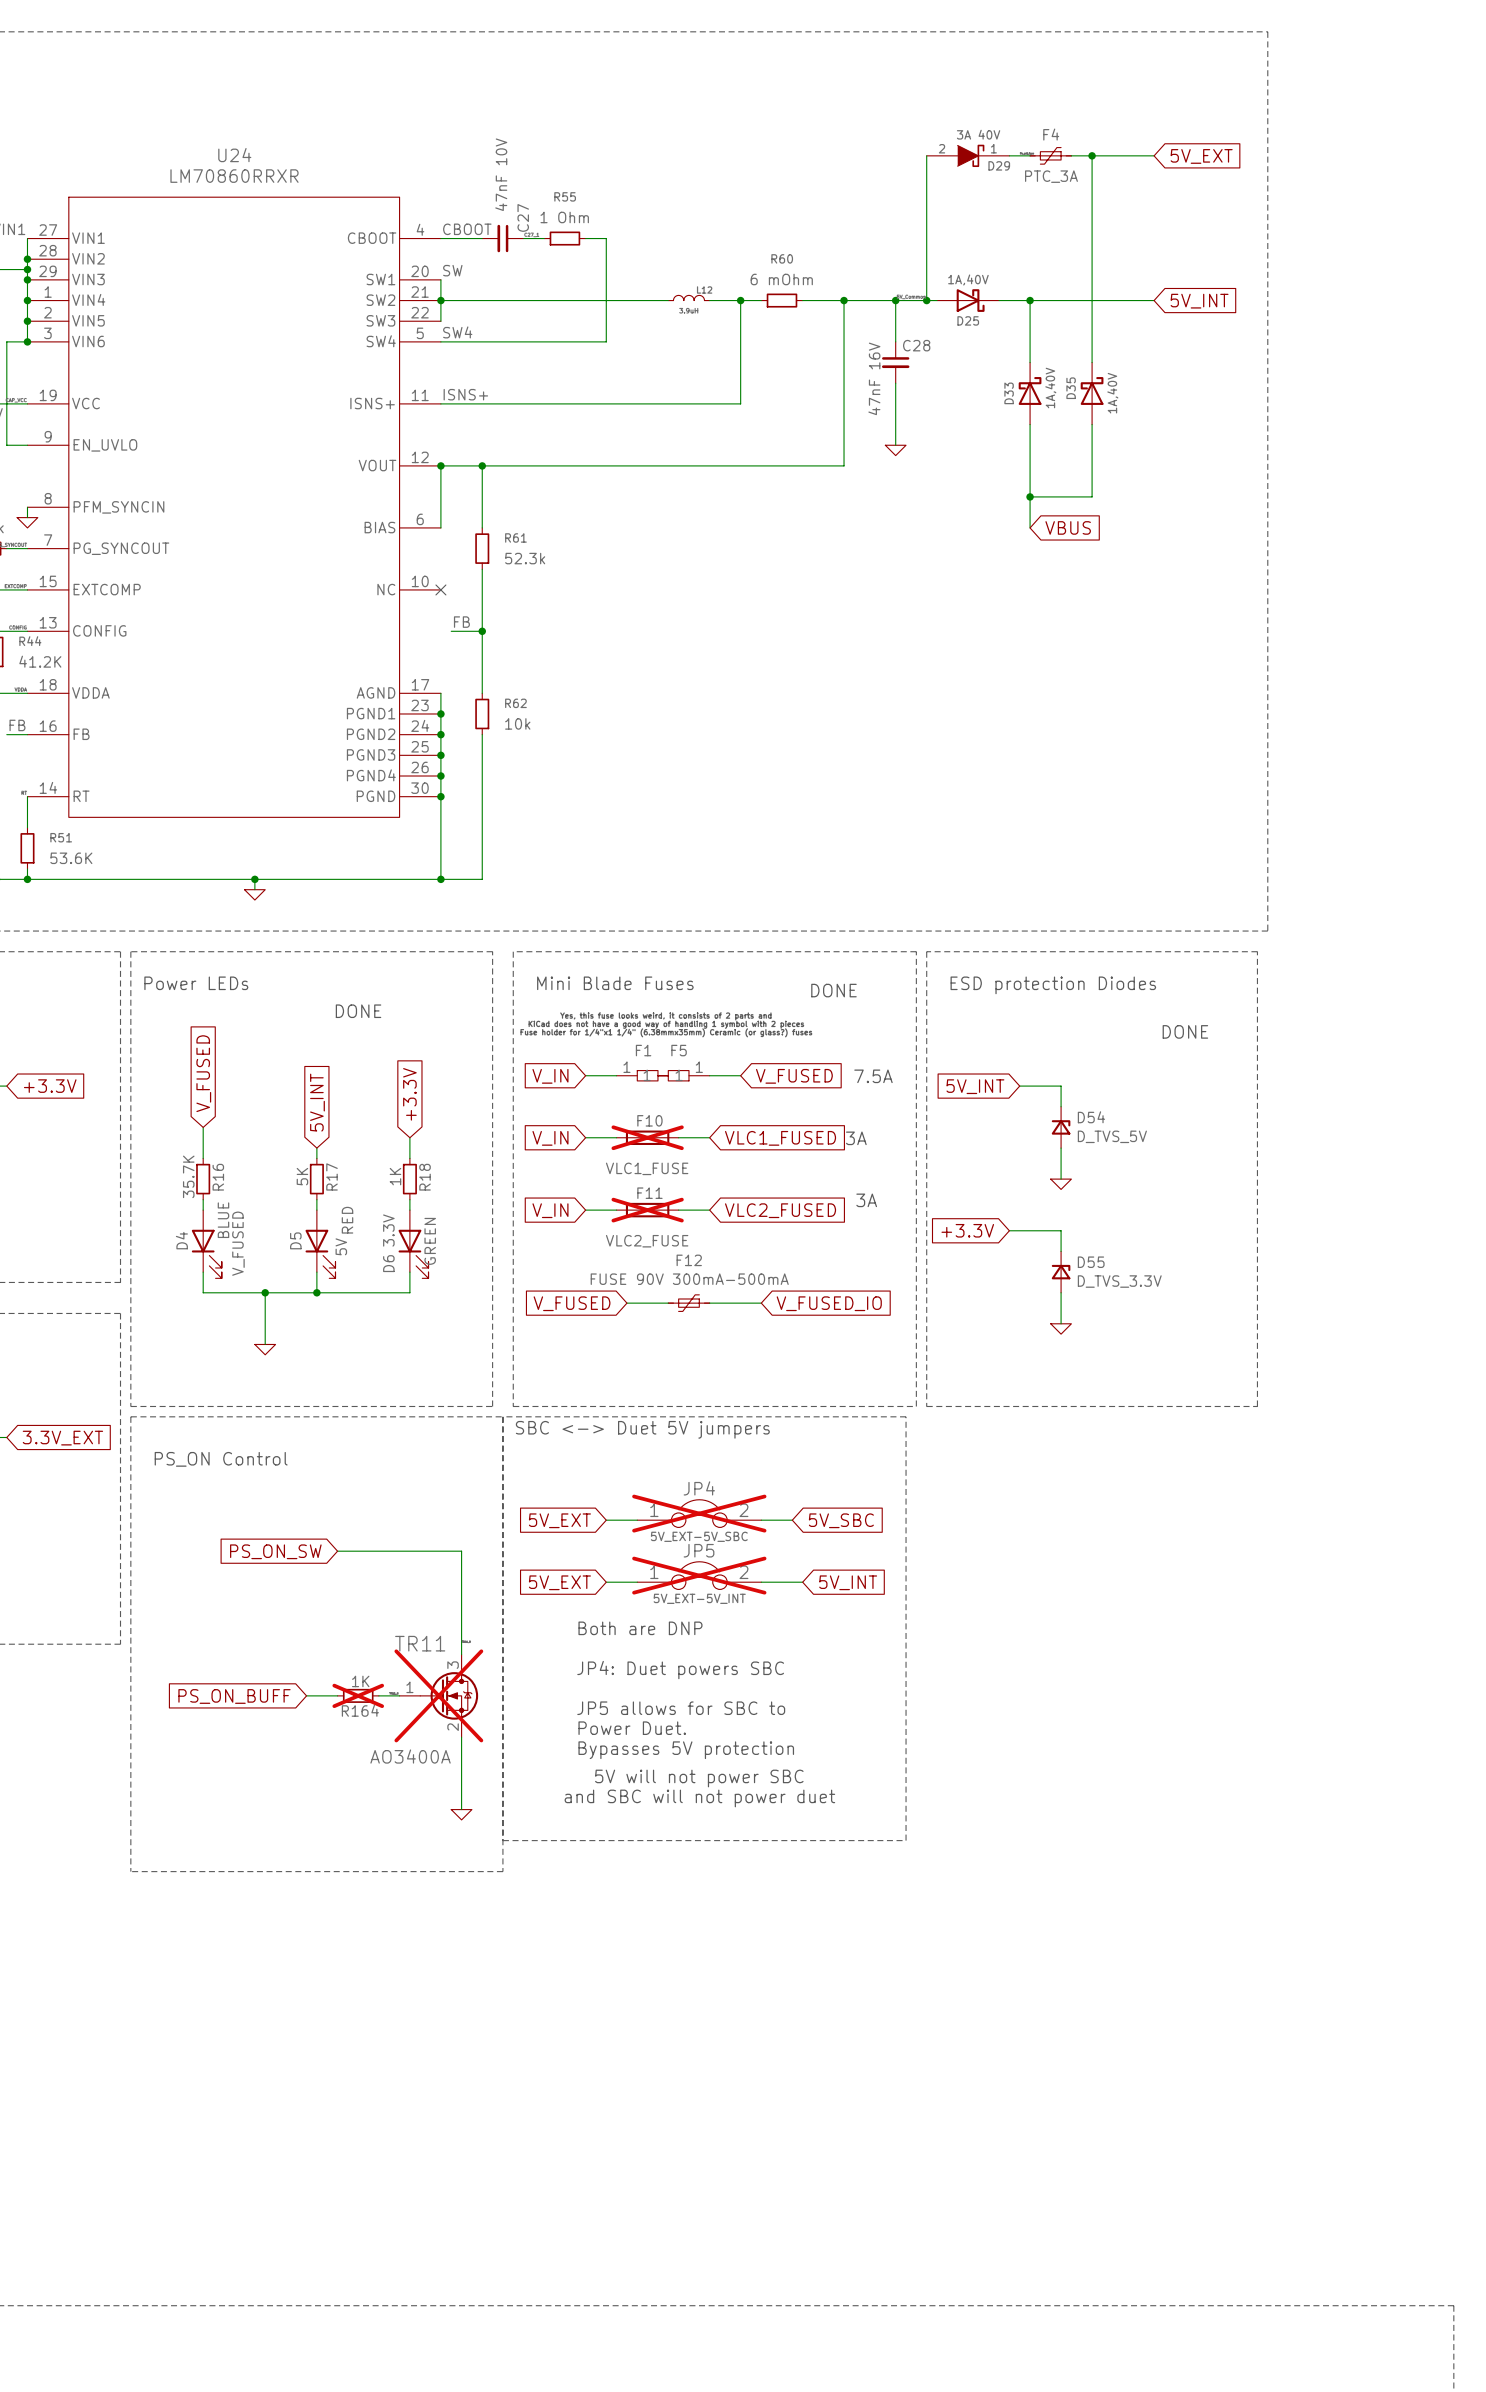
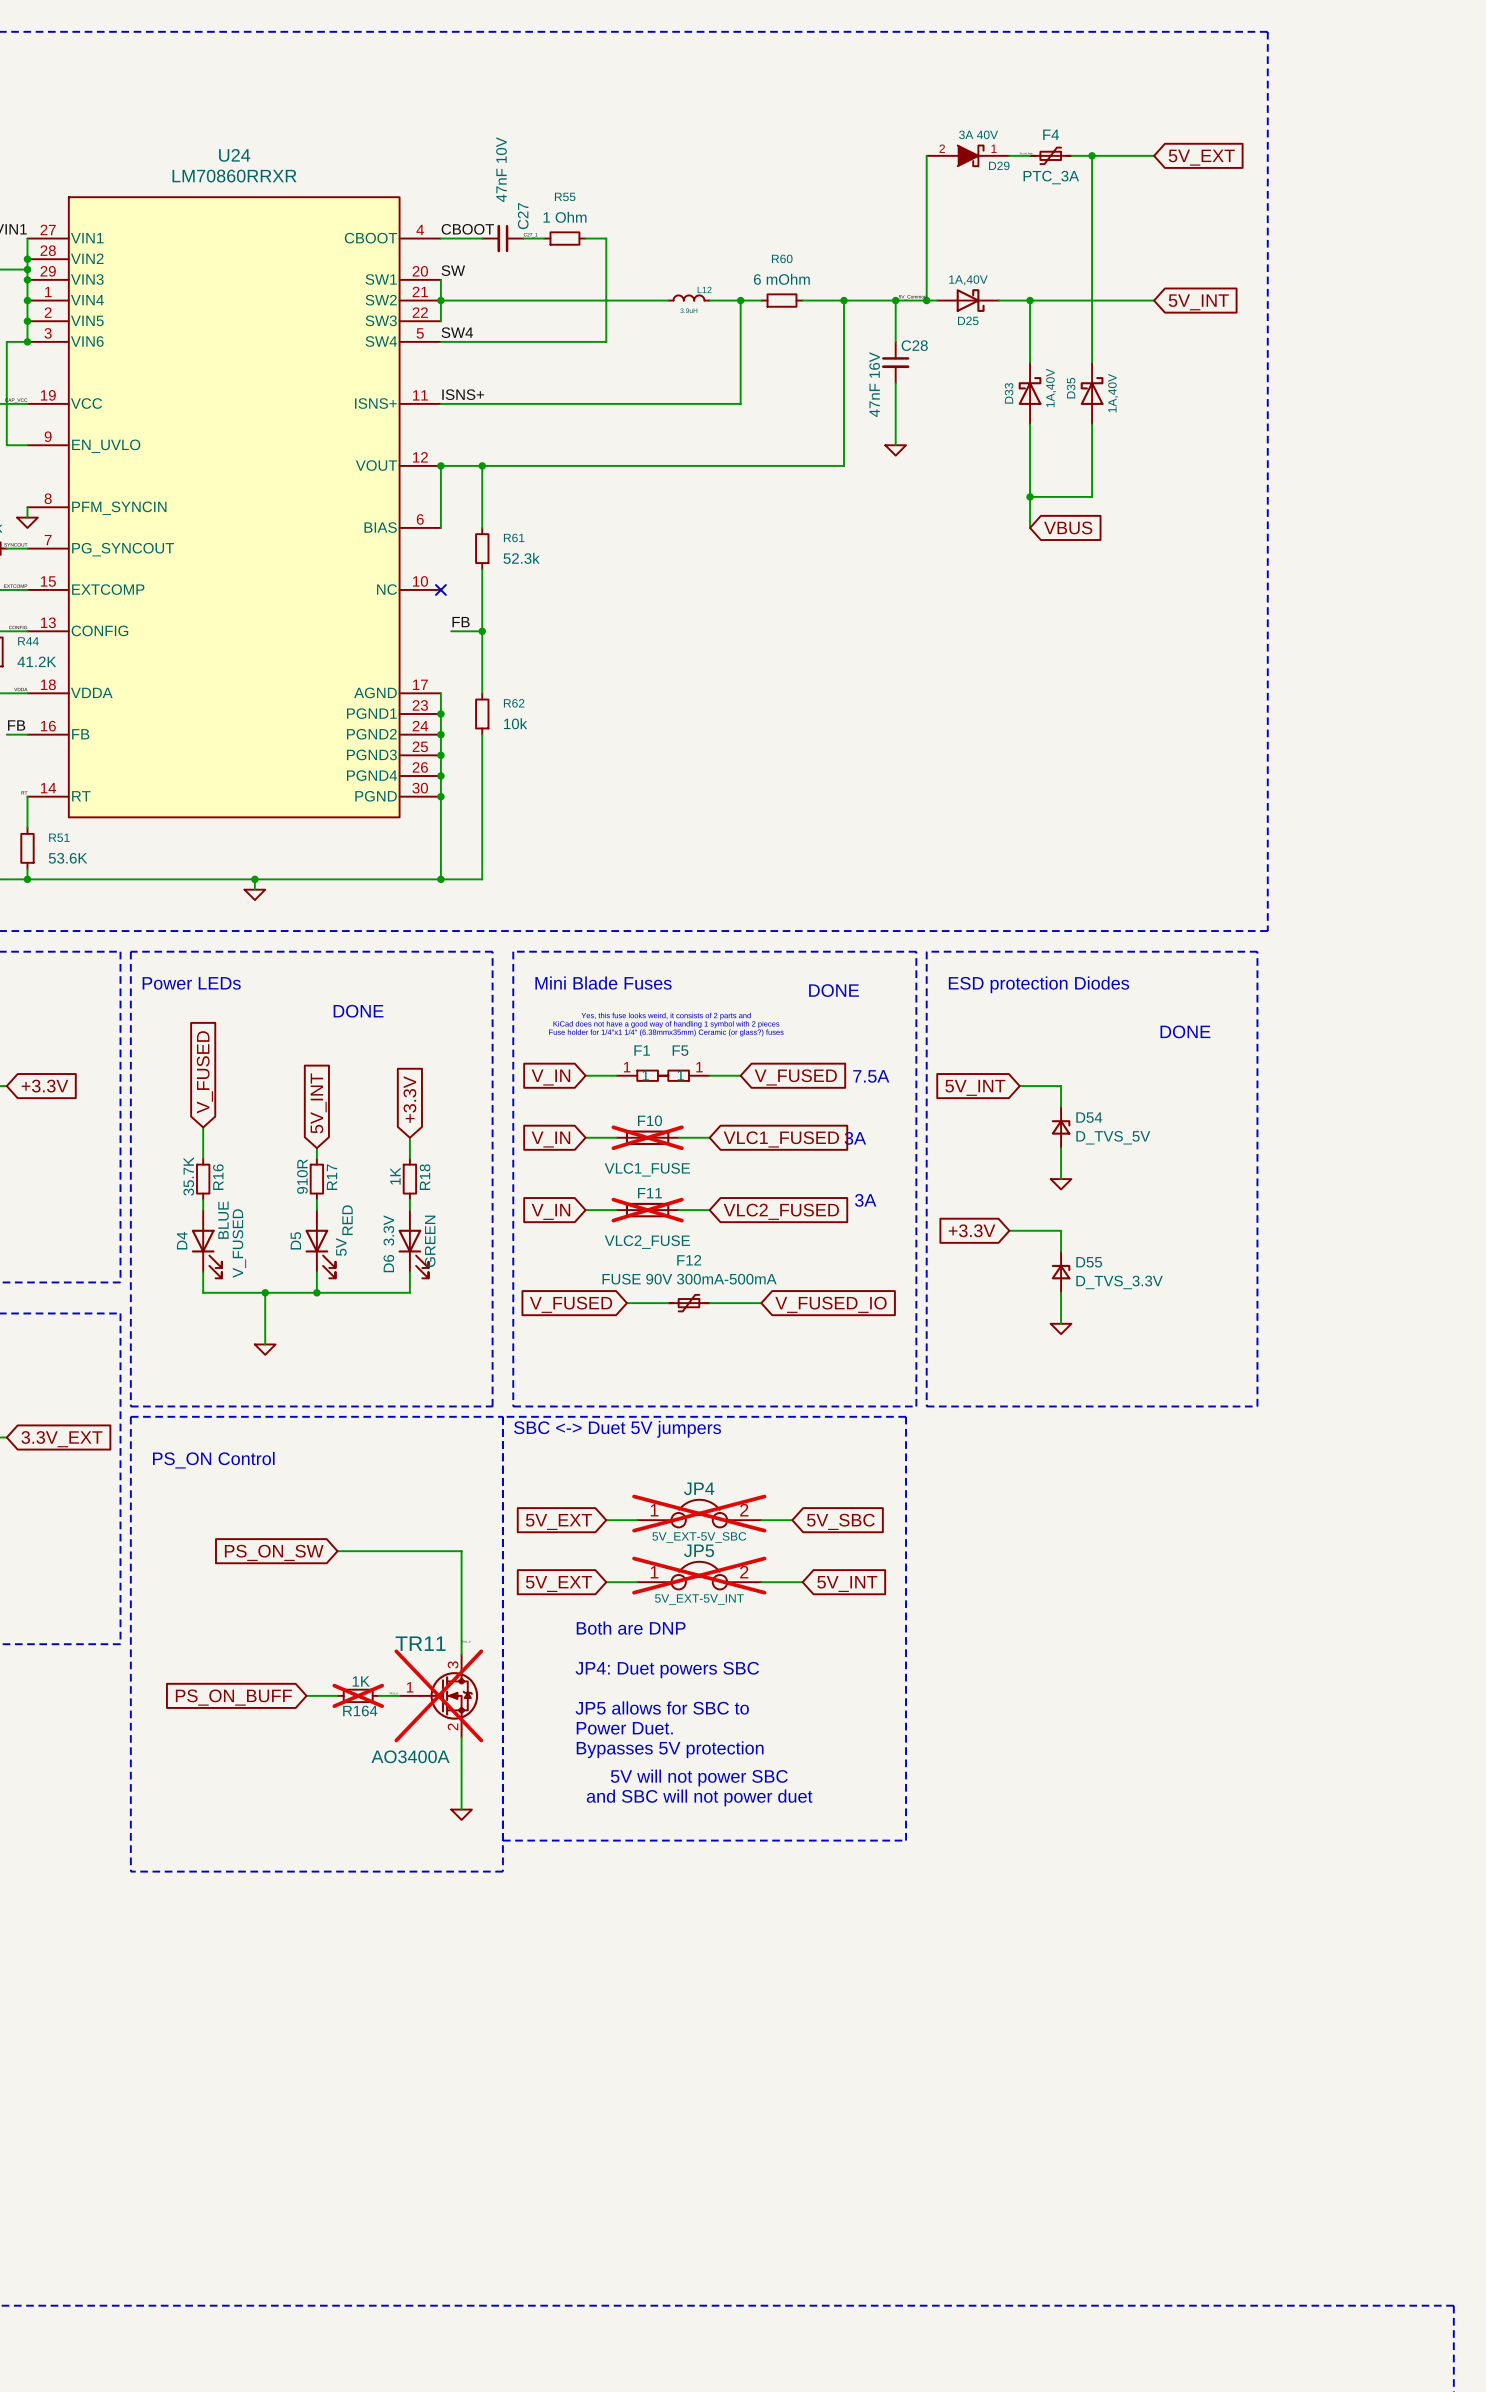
R17 value: 5K (302, 1176) -> 910R (302, 1176)

